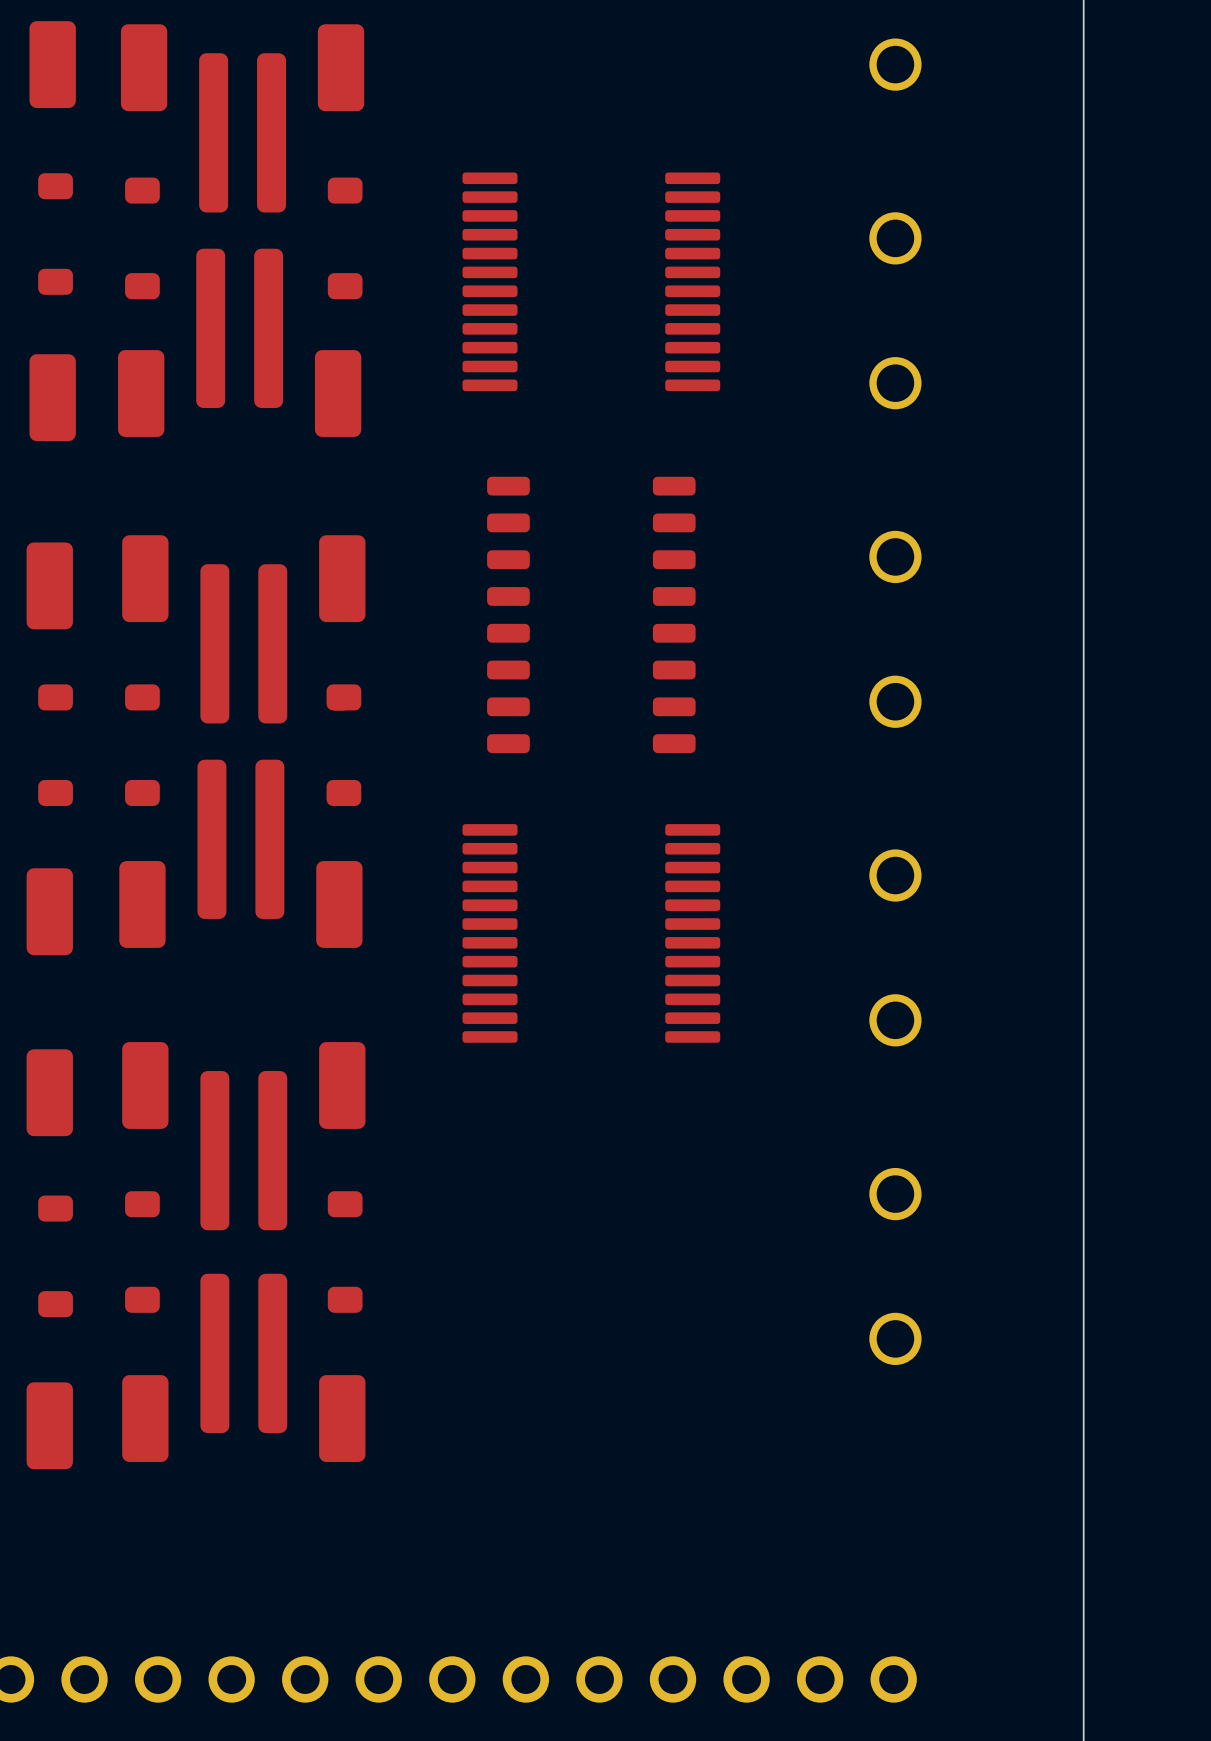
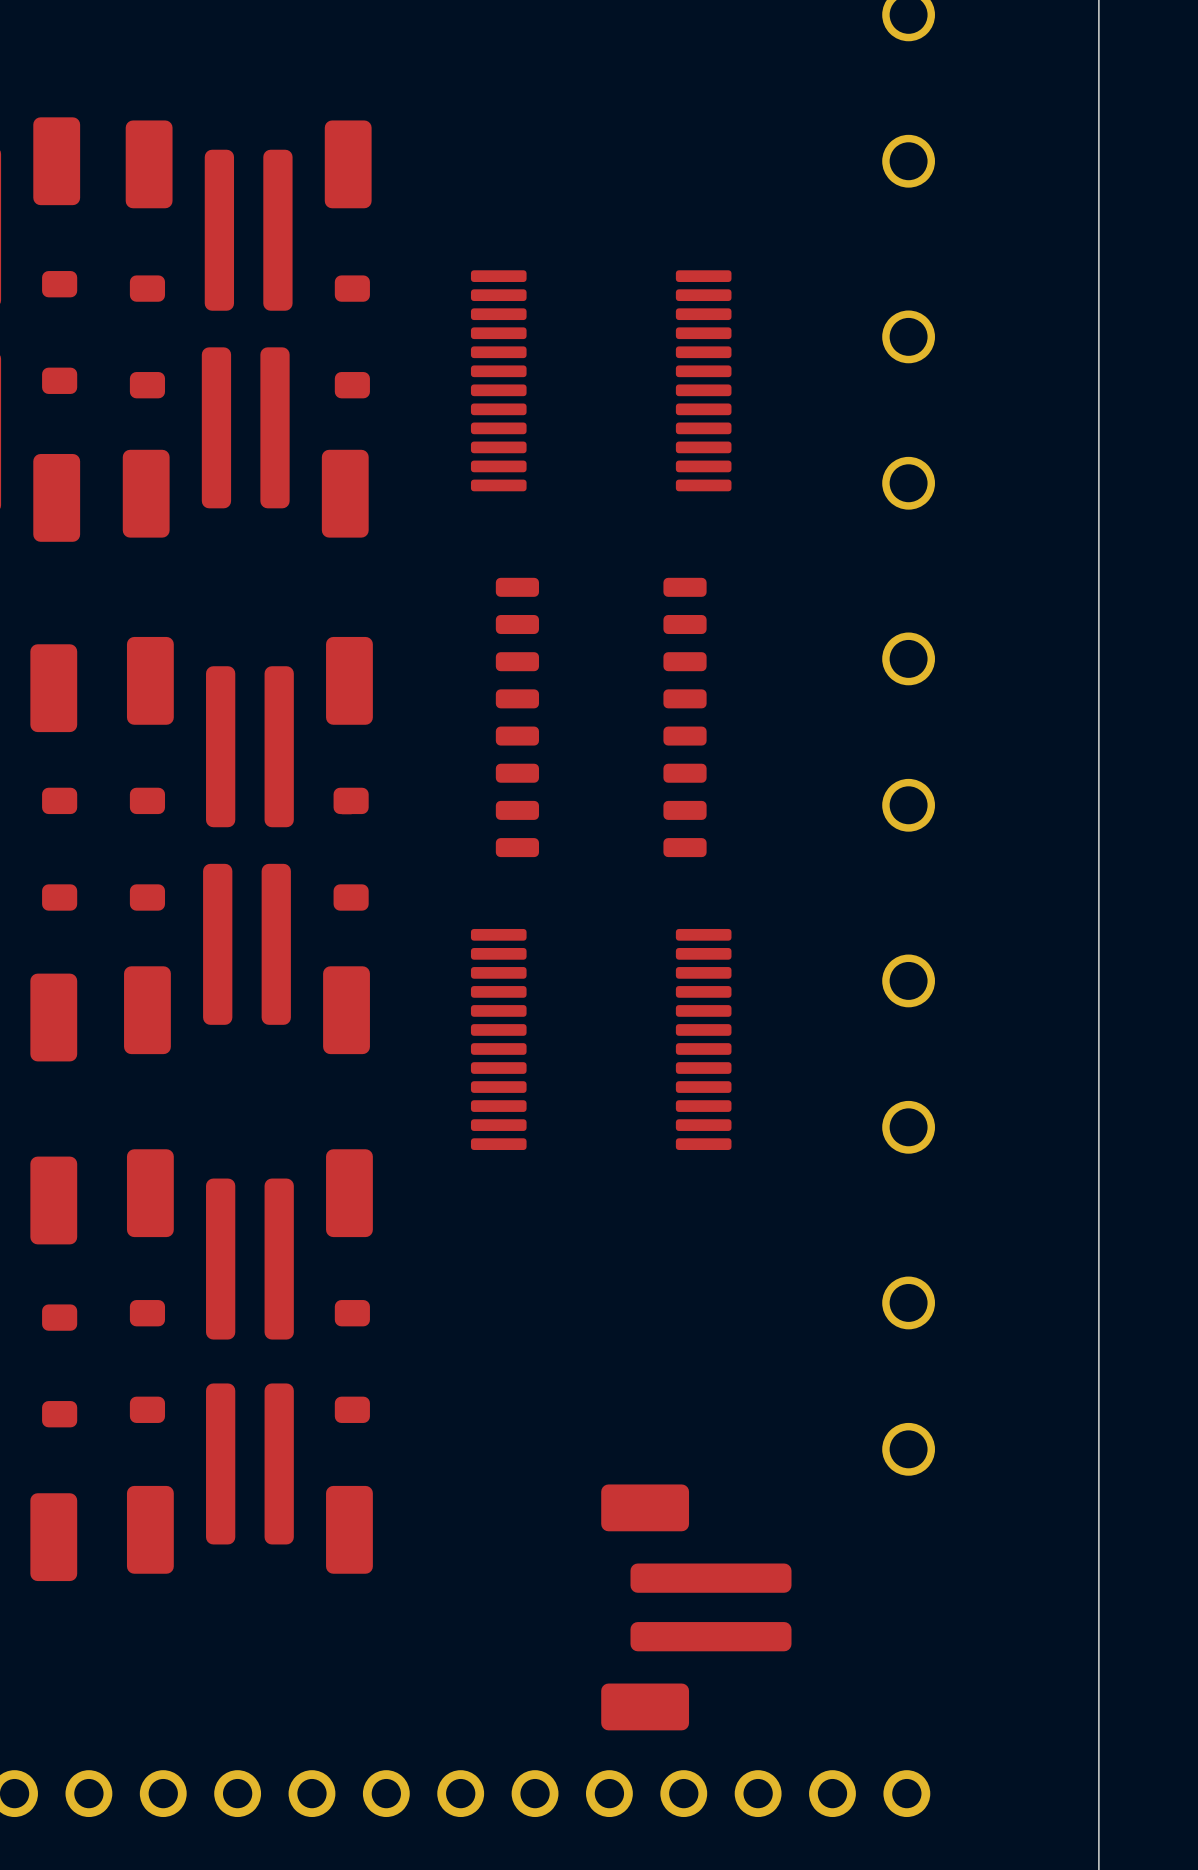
part: none -> (696, 1607)

